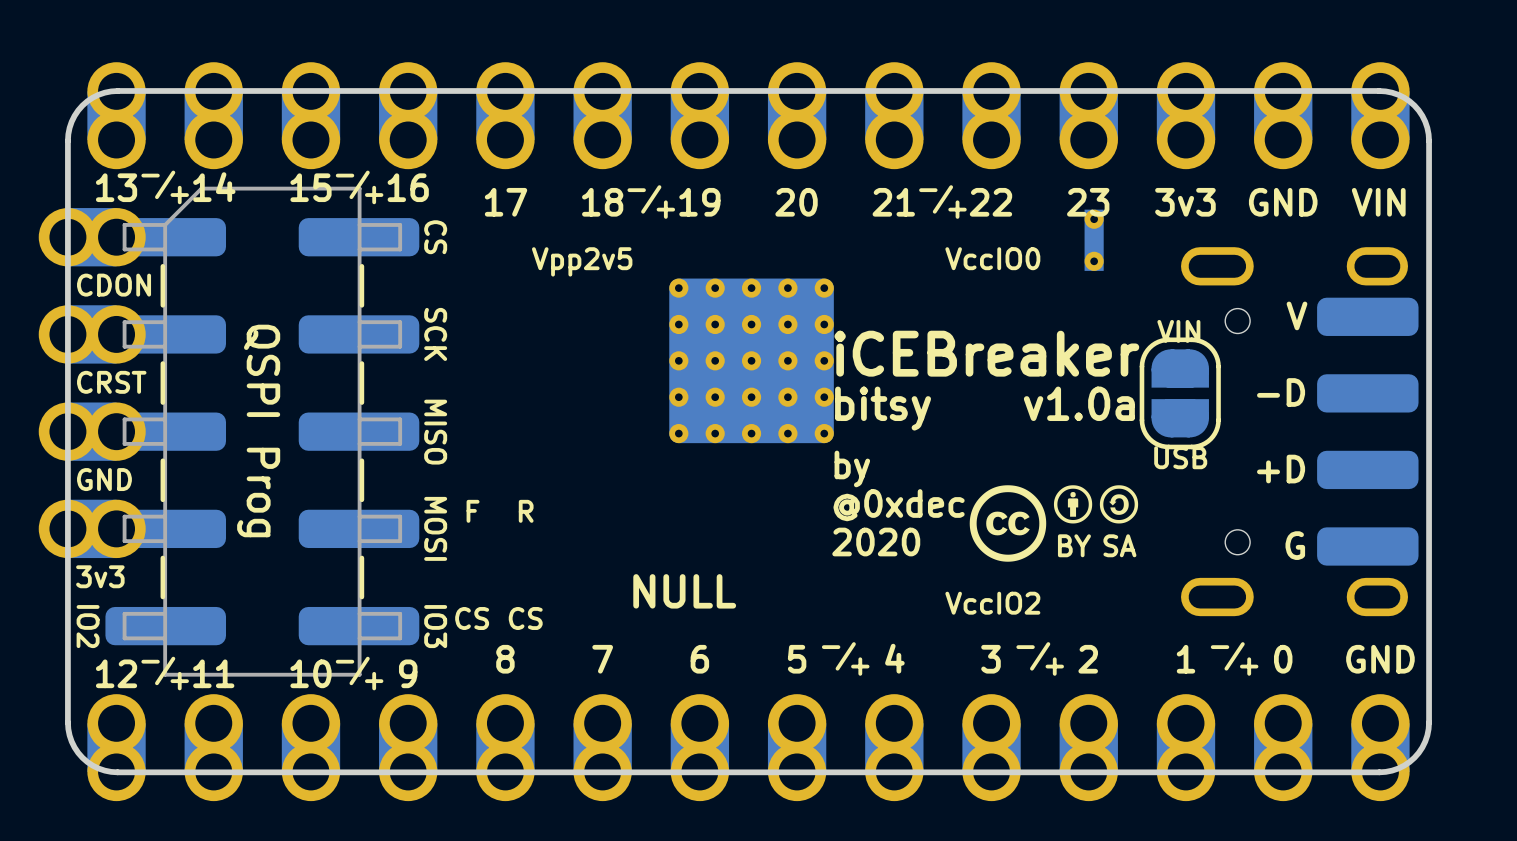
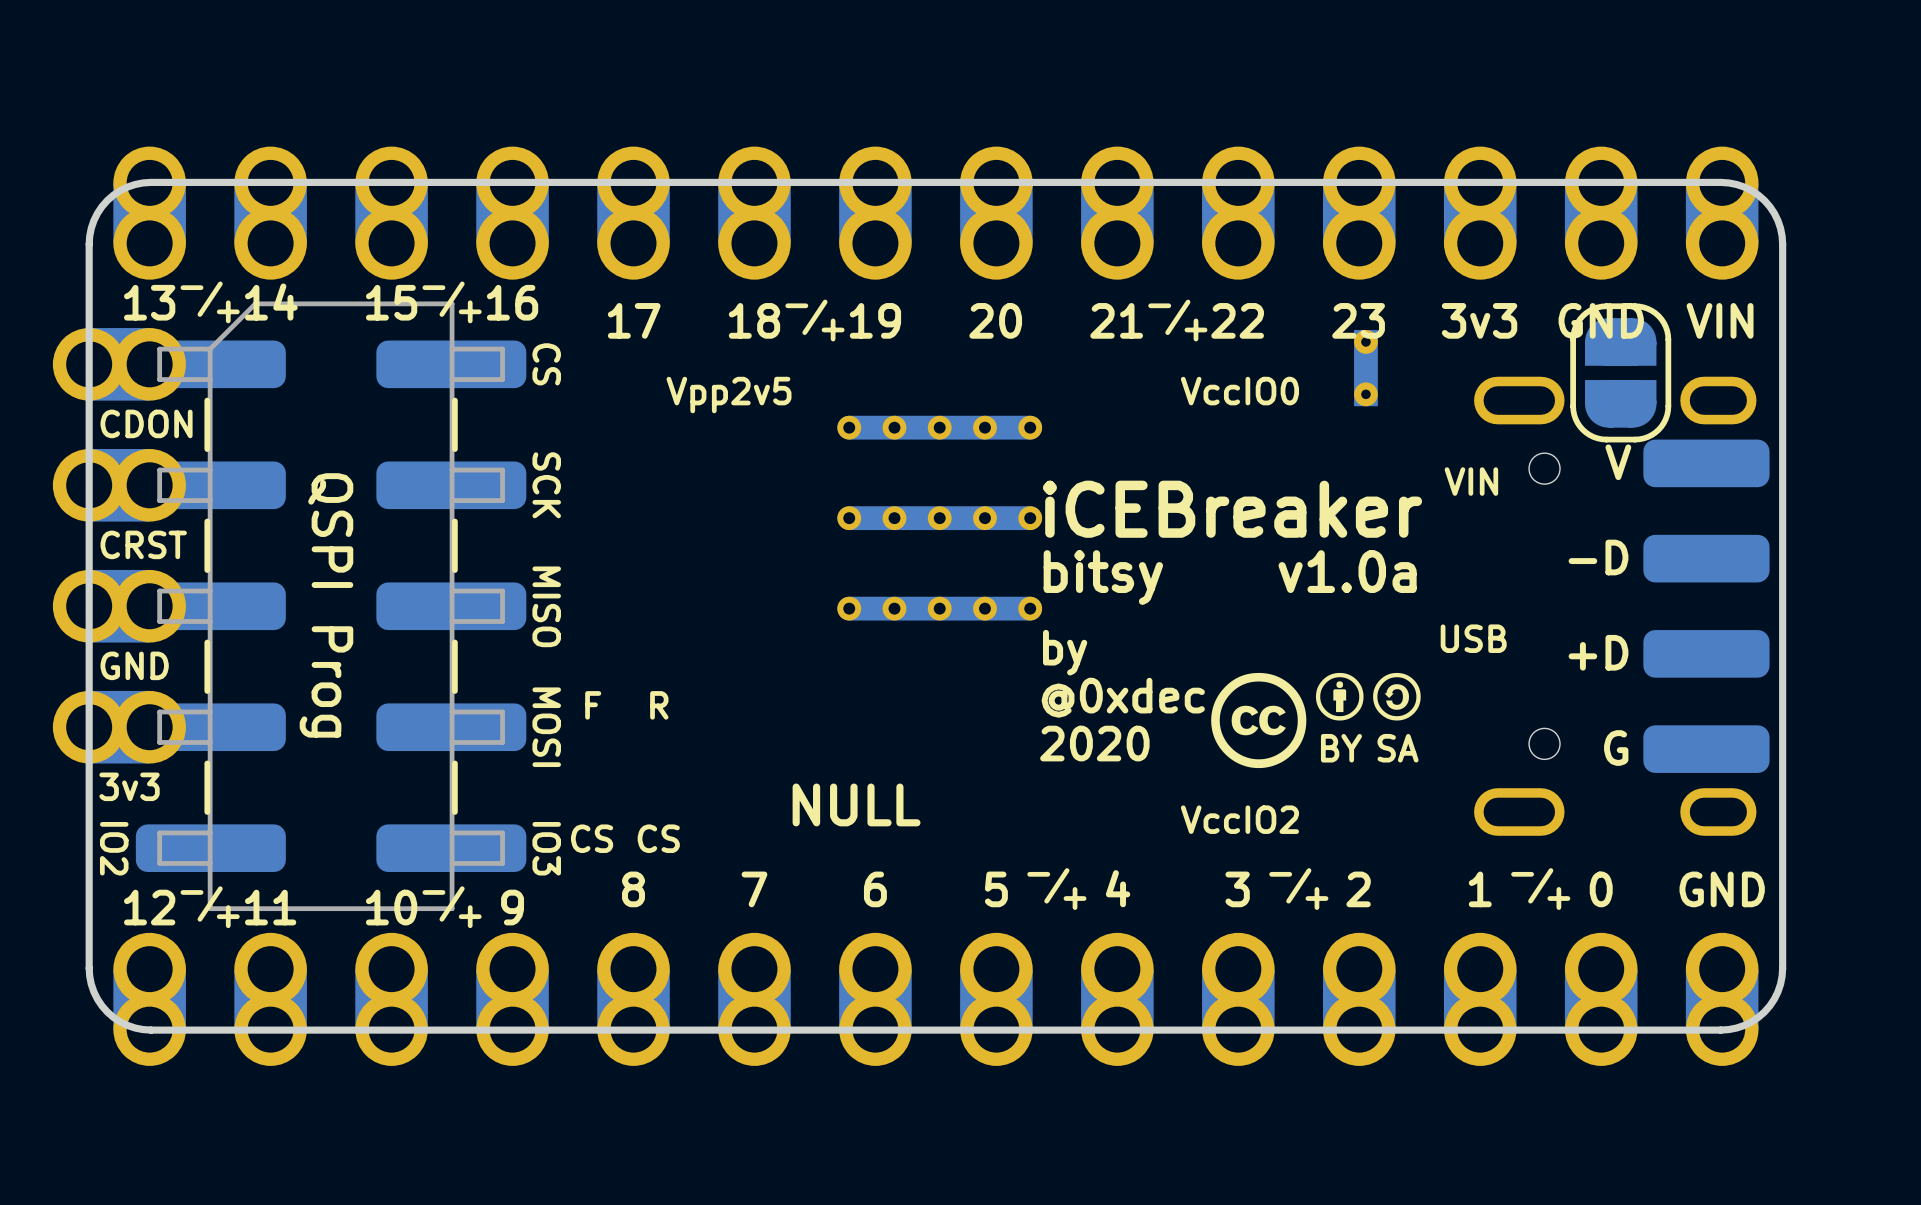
part footprint: [669, 278, 834, 444] -> [837, 415, 1043, 621]
part position: (1180, 393) -> (1620, 372)

